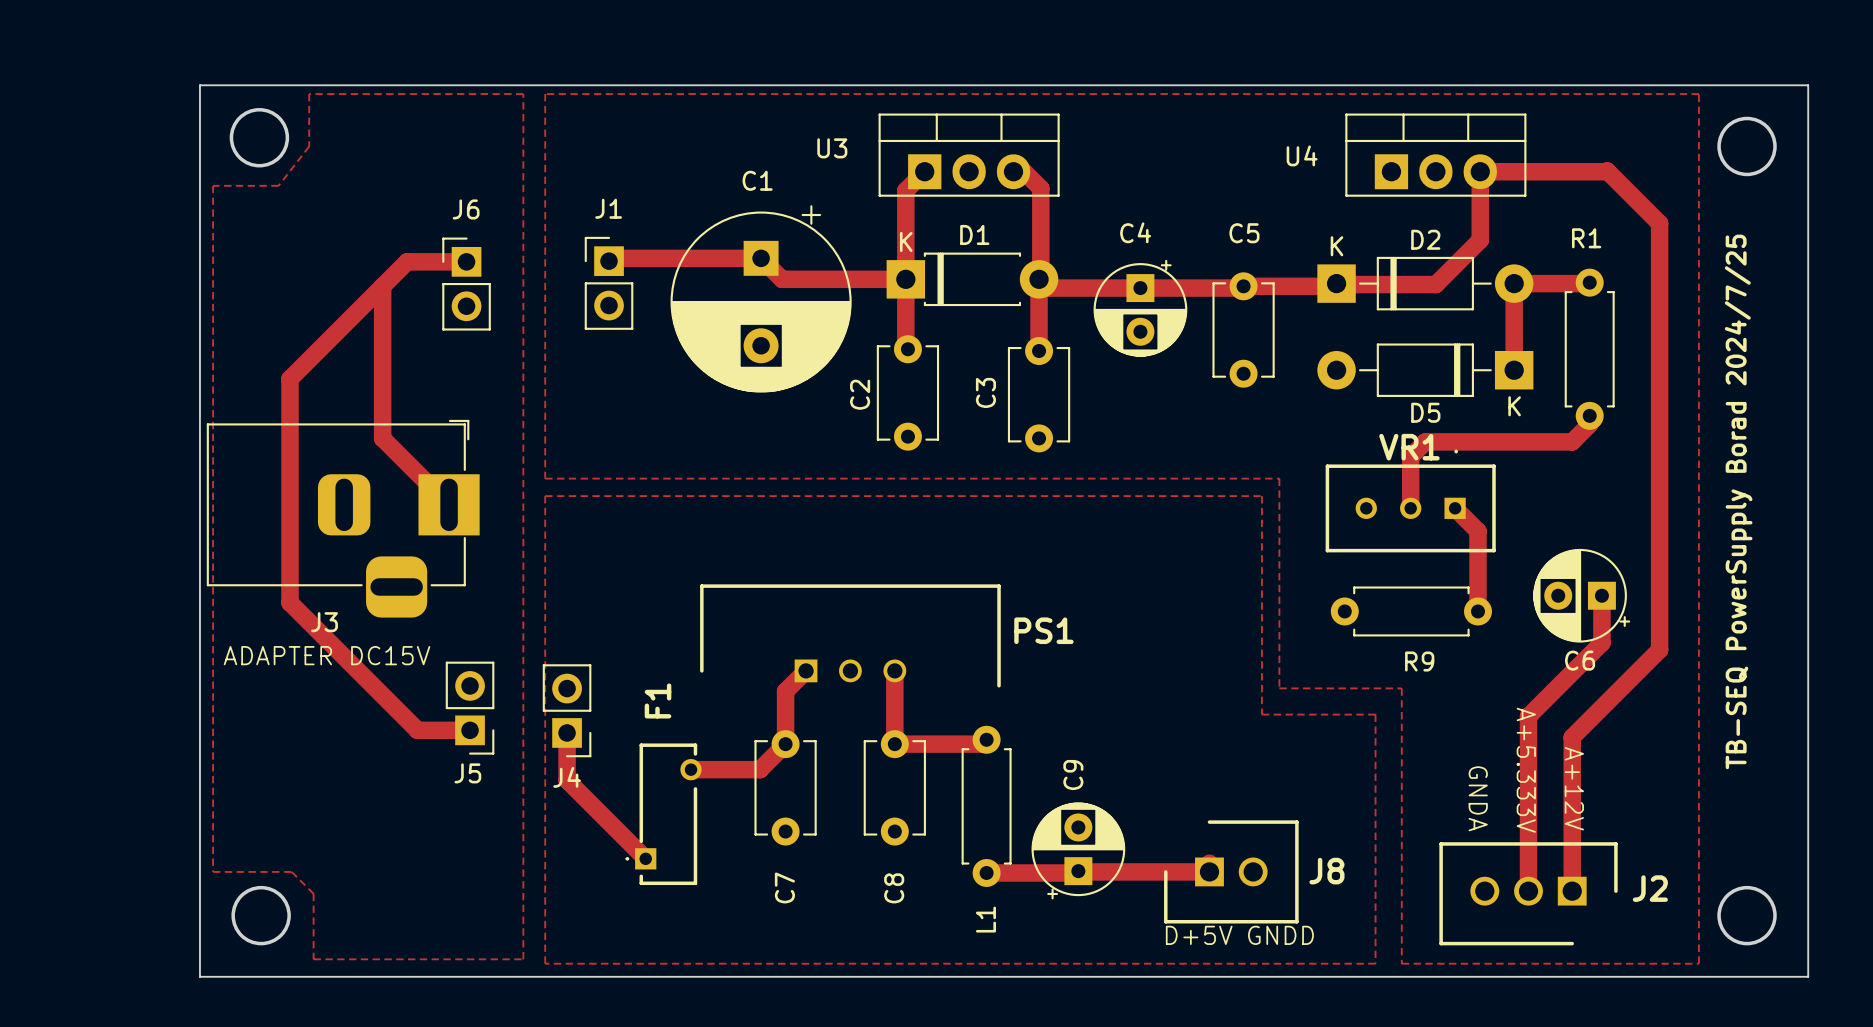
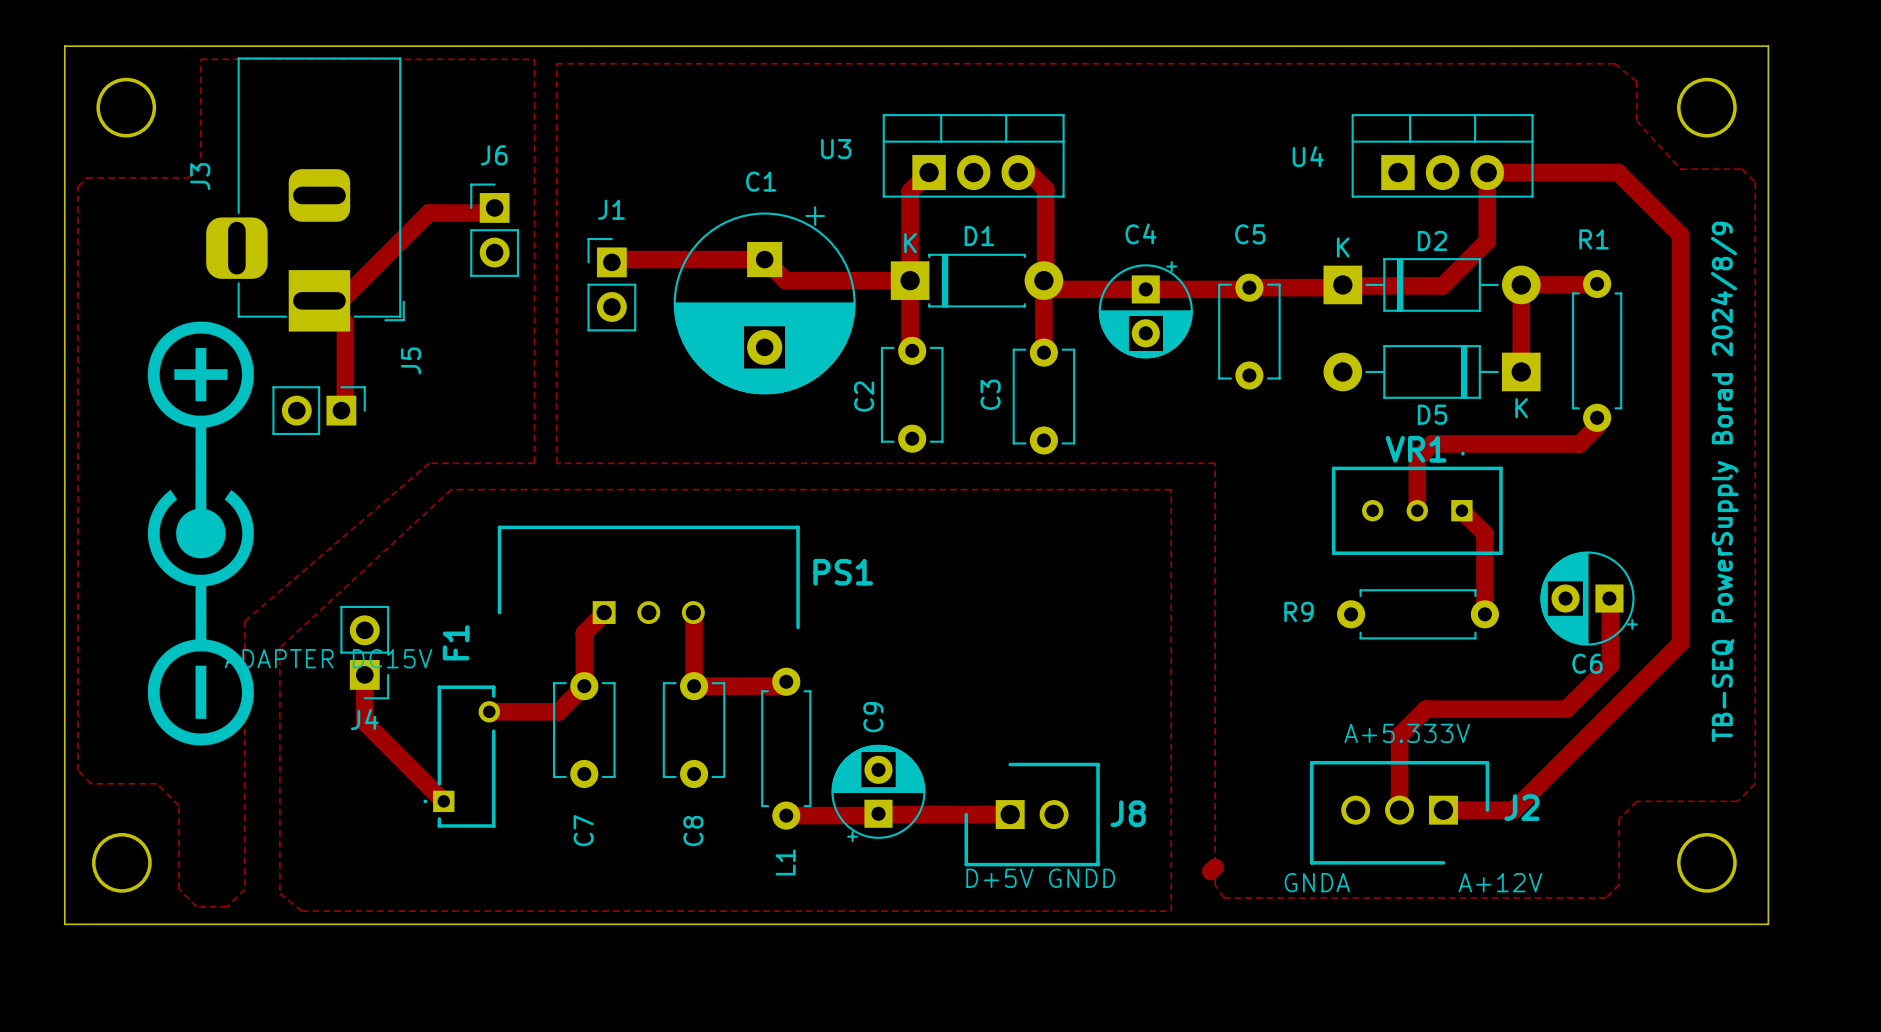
board edge: (199, 85) (1808, 85) (1808, 976) (199, 976) (199, 85) -> (64, 46) (64, 924) (1768, 924) (1768, 46) (64, 46)
zone outline: (309, 94) (523, 94) (523, 959) (313, 959) (313, 893) (291, 871) (213, 871) (213, 185) (278, 185) (309, 146) (309, 94) -> (200, 59) (200, 169) (187, 177) (86, 177) (77, 186) (77, 770) (91, 783) (157, 783) (178, 805) (178, 889) (196, 906) (227, 906) (244, 889) (244, 621) (429, 463) (534, 463) (534, 59) (200, 59)
zone outline: (545, 94) (545, 478) (1279, 478) (1279, 688) (1401, 688) (1401, 963) (1698, 963) (1698, 94) (545, 94) -> (556, 63) (556, 463) (1215, 463) (1215, 884) (1223, 897) (1605, 897) (1619, 884) (1619, 818) (1636, 801) (1737, 801) (1755, 783) (1755, 182) (1742, 169) (1680, 169) (1636, 120) (1636, 81) (1614, 63) (556, 63)
round board edge position: (259, 137) -> (126, 107)
round board edge position: (1747, 146) -> (1706, 107)
track: (1606, 171) (1659, 223) (1659, 649) (1572, 737) (1572, 891) -> (1613, 172) (1618, 172) (1680, 234) (1680, 643) (1513, 810) (1443, 810)
track: none -> (494, 207) (489, 213) (428, 213) (340, 300) (319, 300)
track: (466, 261) (407, 261) (289, 378) (289, 602) (417, 730) (470, 730) -> none
J6 position: (466, 284) -> (494, 230)
track: (382, 286) (382, 438) (449, 504) -> none
track: none -> (323, 300) (345, 322) (345, 406) (341, 410)
drawing: none -> [147, 321, 254, 746]
zone outline: (545, 496) (1261, 496) (1261, 714) (1375, 714) (1375, 963) (545, 963) (545, 496) -> (451, 489) (279, 647) (279, 893) (301, 911) (1171, 911) (1171, 489) (451, 489)
text: TB-SEQ PowerSupply Borad 2024/7/25 (1738, 501) -> TB-SEQ PowerSupply Borad 2024/8/9 (1724, 481)
J3 rotation: 0° (343, 518) -> 90° clockwise (305, 194)
J3 position: (343, 518) -> (305, 194)
track: (1601, 595) (1601, 642) (1528, 716) (1528, 891) -> (1609, 598) (1610, 665) (1566, 709) (1425, 709) (1399, 735) (1399, 810)
PS1 position: (850, 635) -> (648, 577)
R9 name position: R9 (1419, 661) -> R9 (1299, 611)
track: (806, 670) (785, 691) (785, 744) (760, 769) (691, 769) -> (604, 612) (584, 633) (584, 686) (558, 711) (489, 711)
track: (894, 670) (894, 744) (982, 744) (986, 739) -> (694, 612) (694, 686) (781, 686) (786, 681)
J5 rotation: 0° (470, 708) -> 90° counterclockwise (319, 410)
J5 position: (470, 708) -> (319, 410)
J4 position: (567, 710) -> (364, 652)
track: (567, 732) (567, 780) (645, 858) -> (364, 674) (364, 722) (443, 801)
text rotation: 0° (1526, 770) -> 90° counterclockwise (1407, 733)
J5 name position: J5 (467, 773) -> J5 (411, 360)
C7 position: (785, 787) -> (584, 730)
C8 position: (894, 787) -> (694, 730)
text rotation: 0° (1574, 788) -> 90° counterclockwise (1500, 882)
text position: A+12V (1574, 788) -> A+12V (1500, 882)
text rotation: 0° (1478, 798) -> 90° counterclockwise (1317, 882)
text position: GNDA (1478, 798) -> GNDA (1317, 882)
L1 position: (986, 806) -> (786, 748)
F1 position: (663, 814) -> (461, 756)
C9 position: (1078, 850) -> (878, 793)
track: (1078, 867) (1072, 872) (986, 872) -> (878, 810) (873, 815) (786, 815)
track: (1078, 871) (1205, 871) -> (878, 814) (1005, 814)
J8 position: (1231, 871) -> (1032, 814)
J2 position: (1528, 893) -> (1399, 812)
round board edge position: (261, 915) -> (121, 862)
round board edge position: (1747, 915) -> (1706, 862)
text position: D+5V (1199, 935) -> D+5V (999, 878)
text position: GNDD (1280, 935) -> GNDD (1082, 878)

